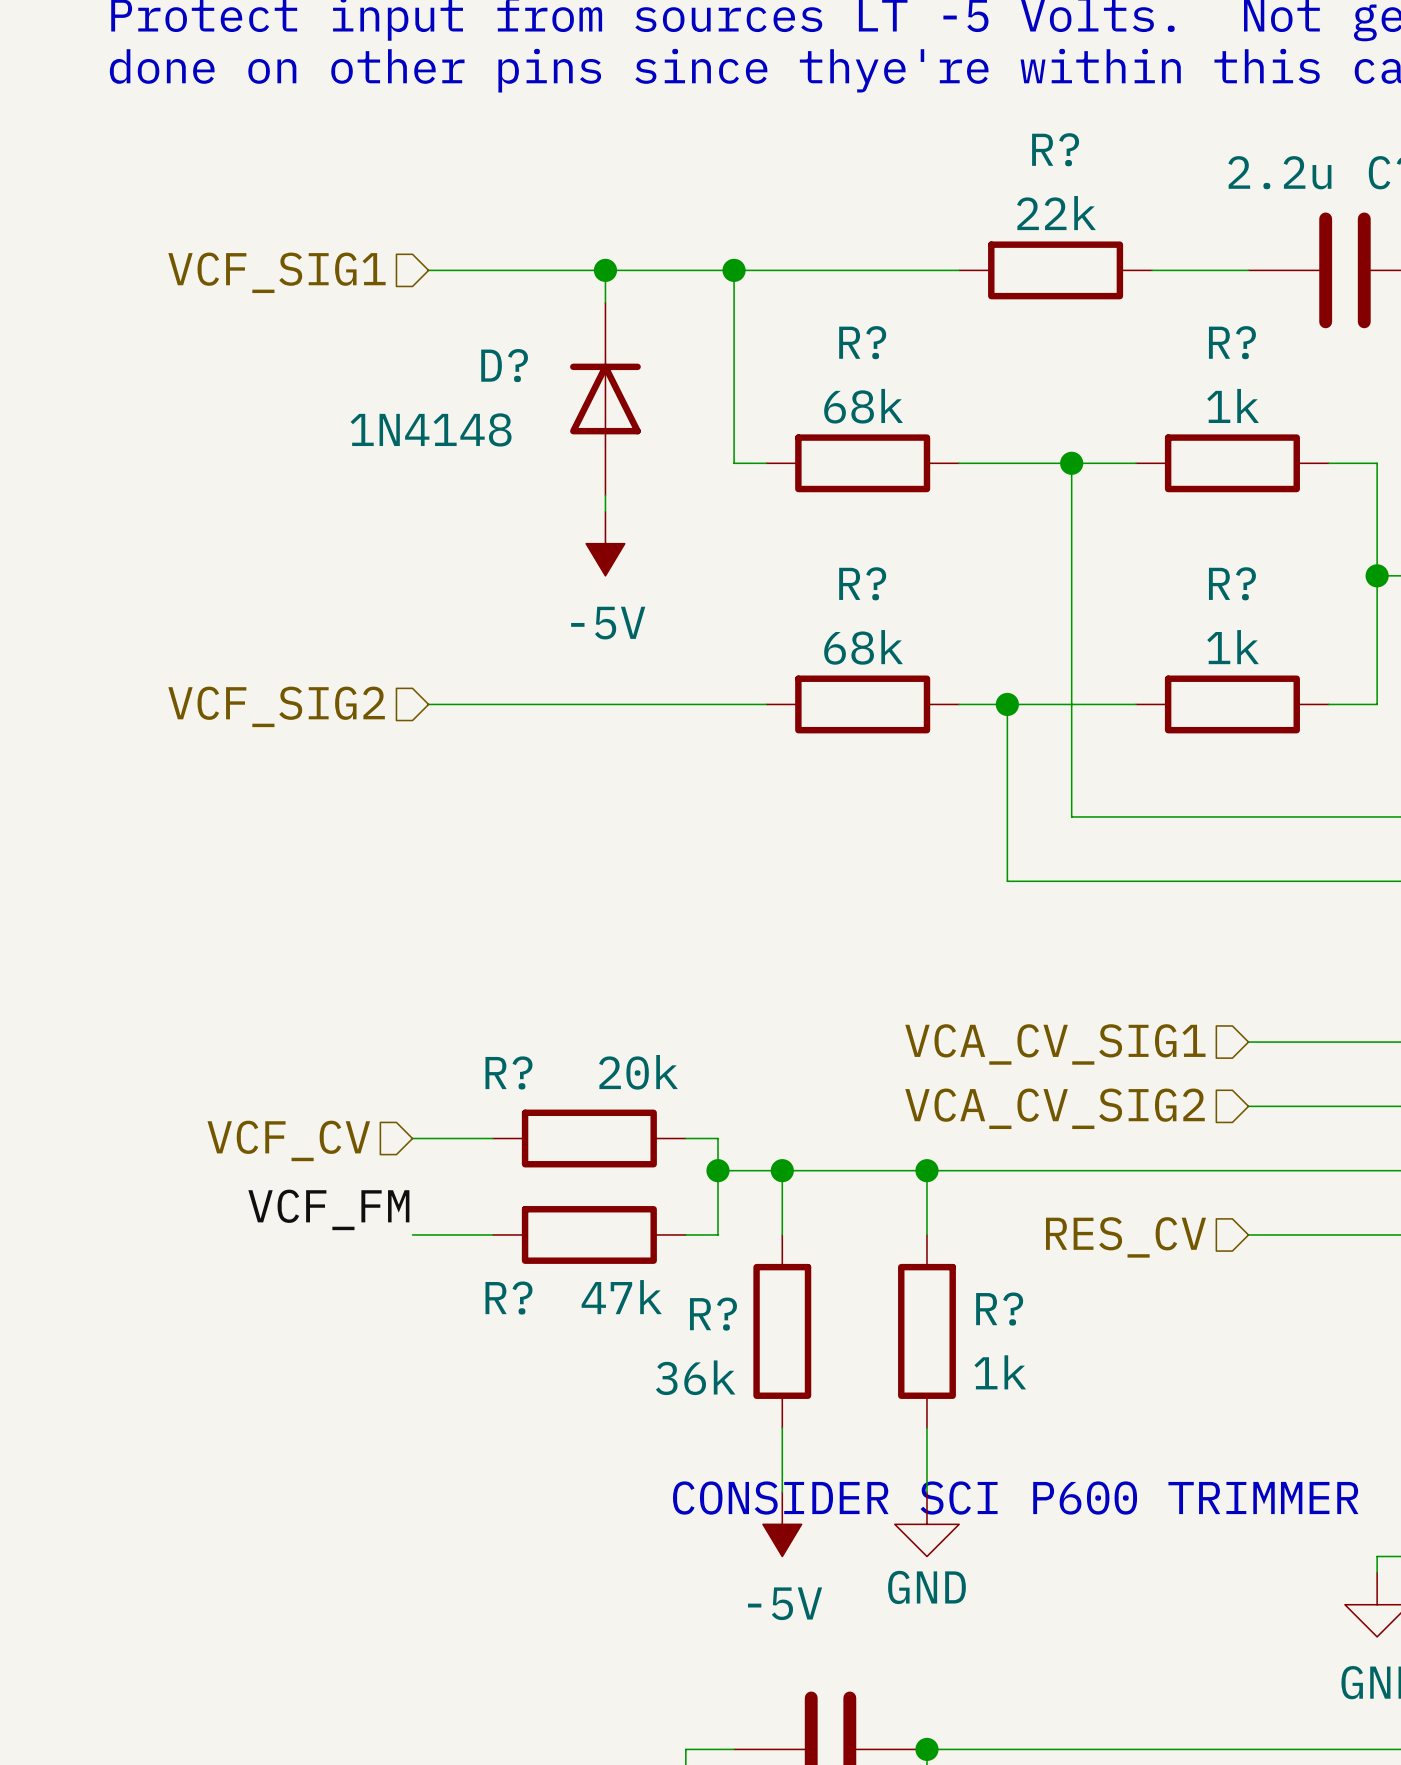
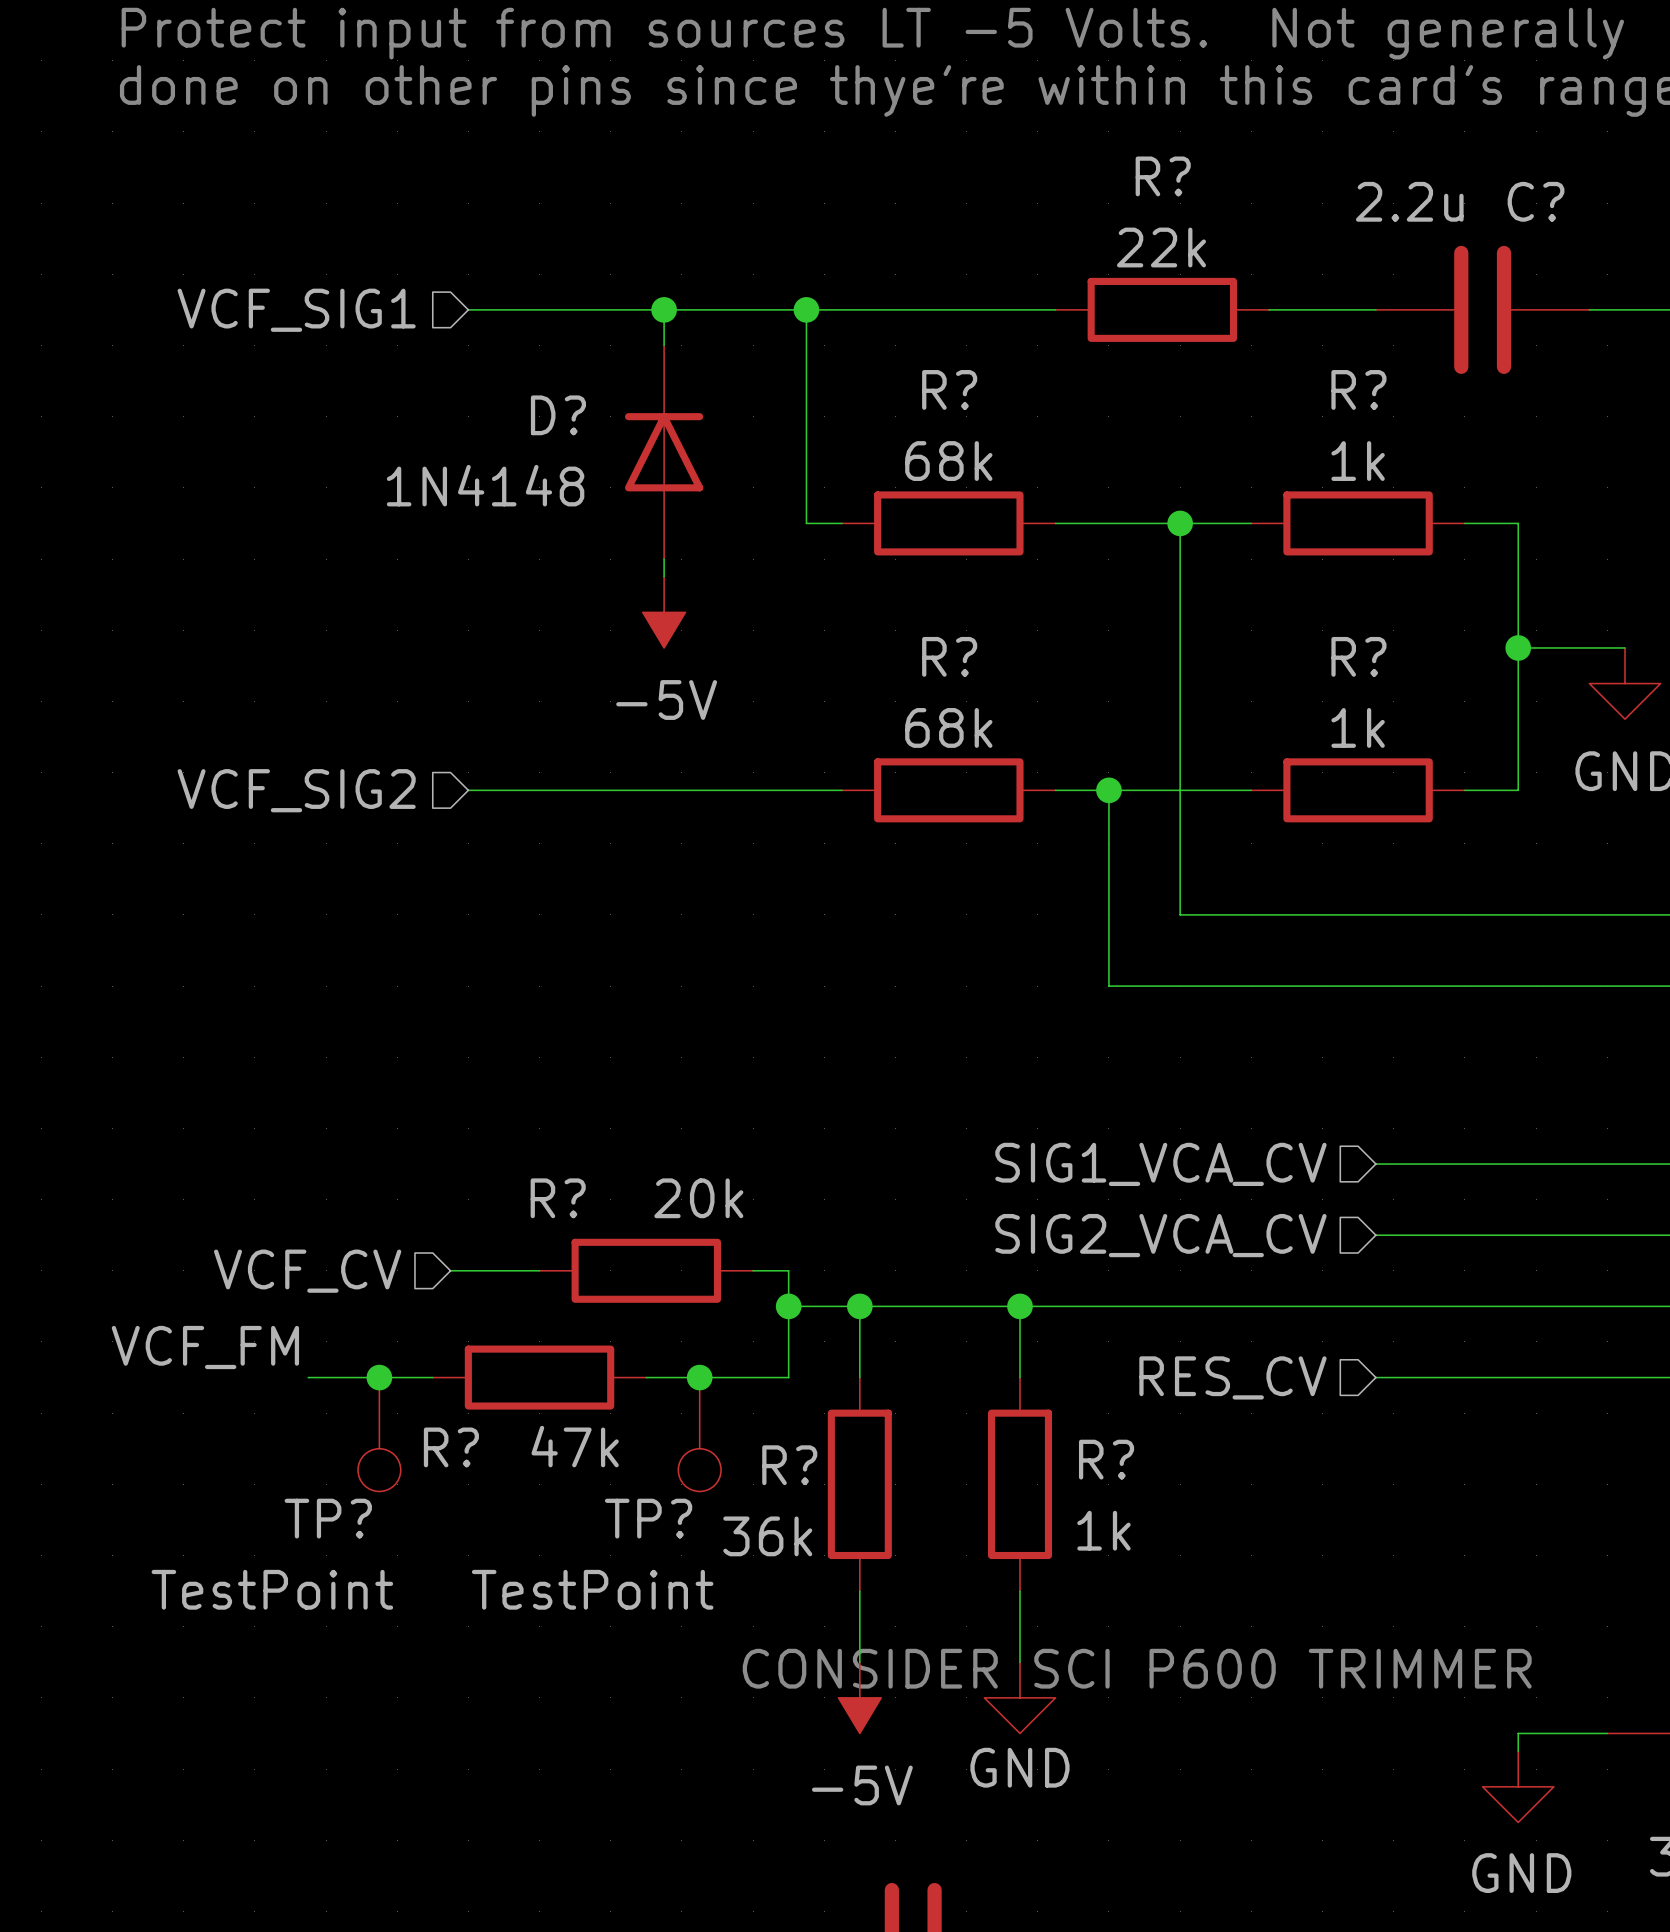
hierarchical label: VCA_CV_SIG1 (1055, 1044) -> SIG1_VCA_CV (1160, 1164)
hierarchical label: VCA_CV_SIG2 (1055, 1108) -> SIG2_VCA_CV (1160, 1235)
label position: VCF_FM (328, 1209) -> VCF_FM (205, 1347)
wire: none -> (308, 1377) (432, 1377)
junction: none -> (379, 1377)
wire: (412, 1234) (492, 1234) -> none
wire: none -> (646, 1377) (753, 1377)
R? position: (589, 1234) -> (539, 1377)
junction: none -> (699, 1377)
TP?: none -> TestPoint (379, 1434)
TP?: none -> TestPoint (699, 1434)

